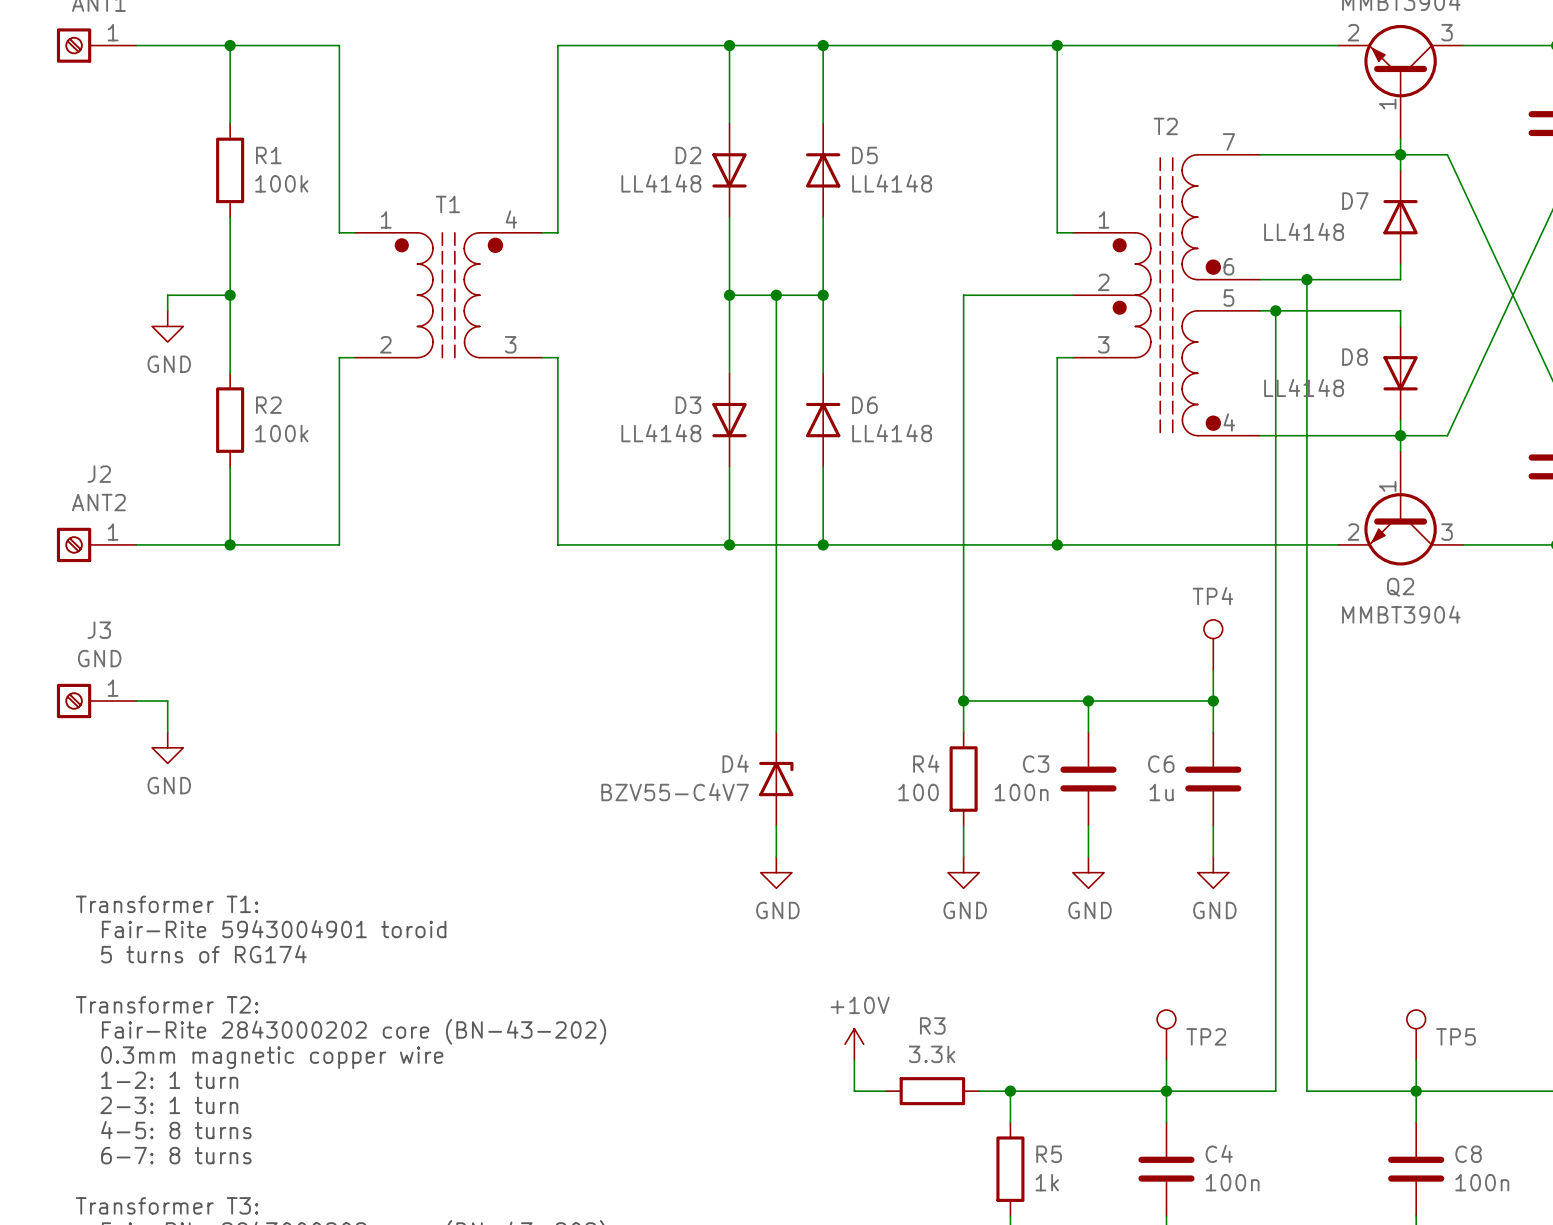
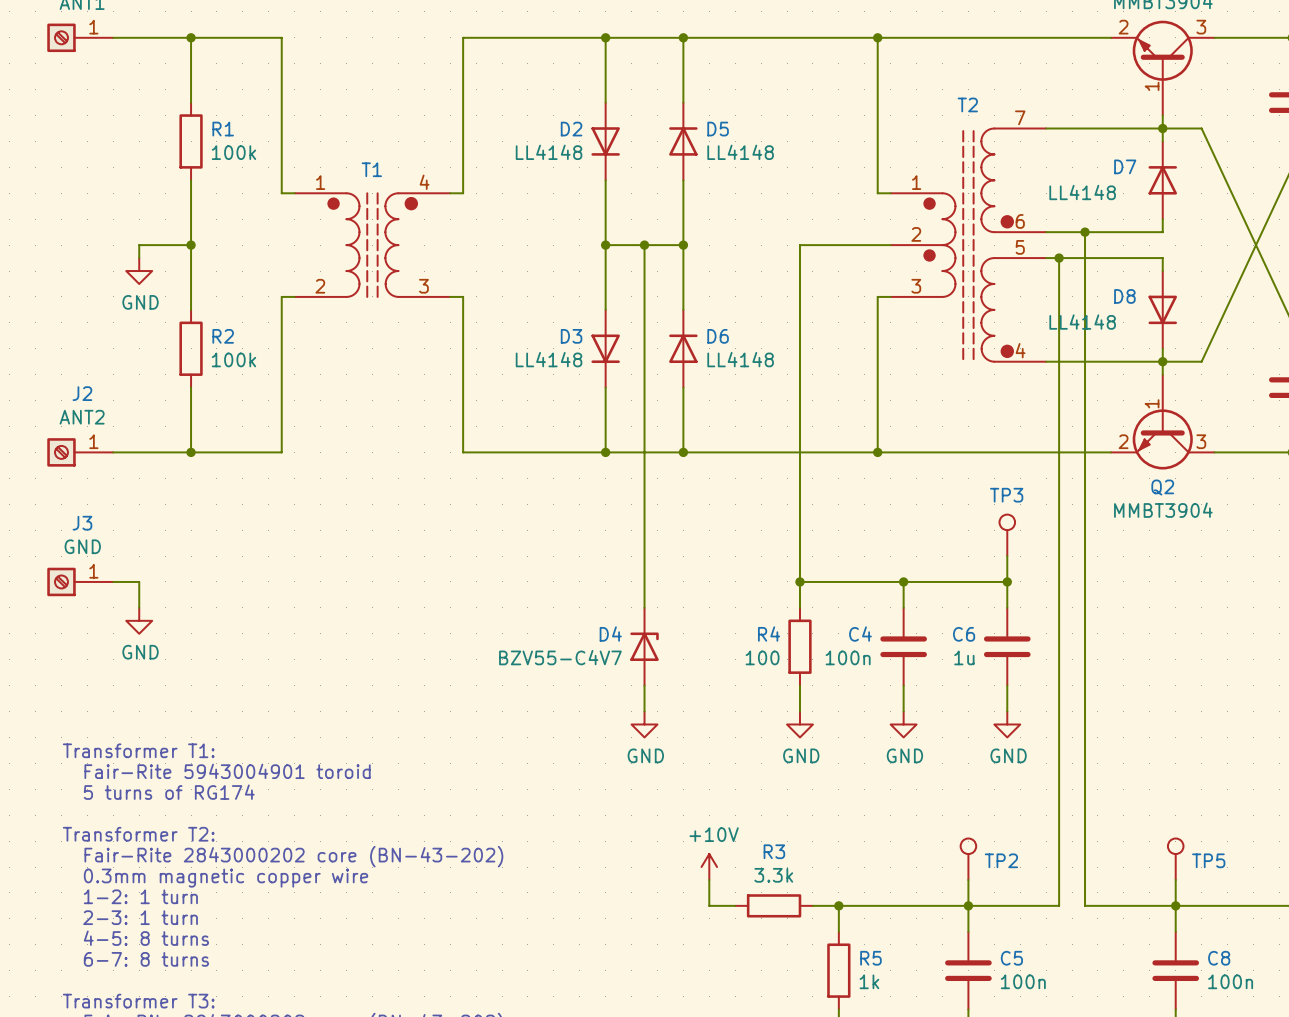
TP4 name: TP4 (1212, 596) -> TP3 (1006, 495)
C3 name: C3 (1036, 764) -> C4 (860, 634)
C4 name: C4 (1219, 1153) -> C5 (1011, 958)

